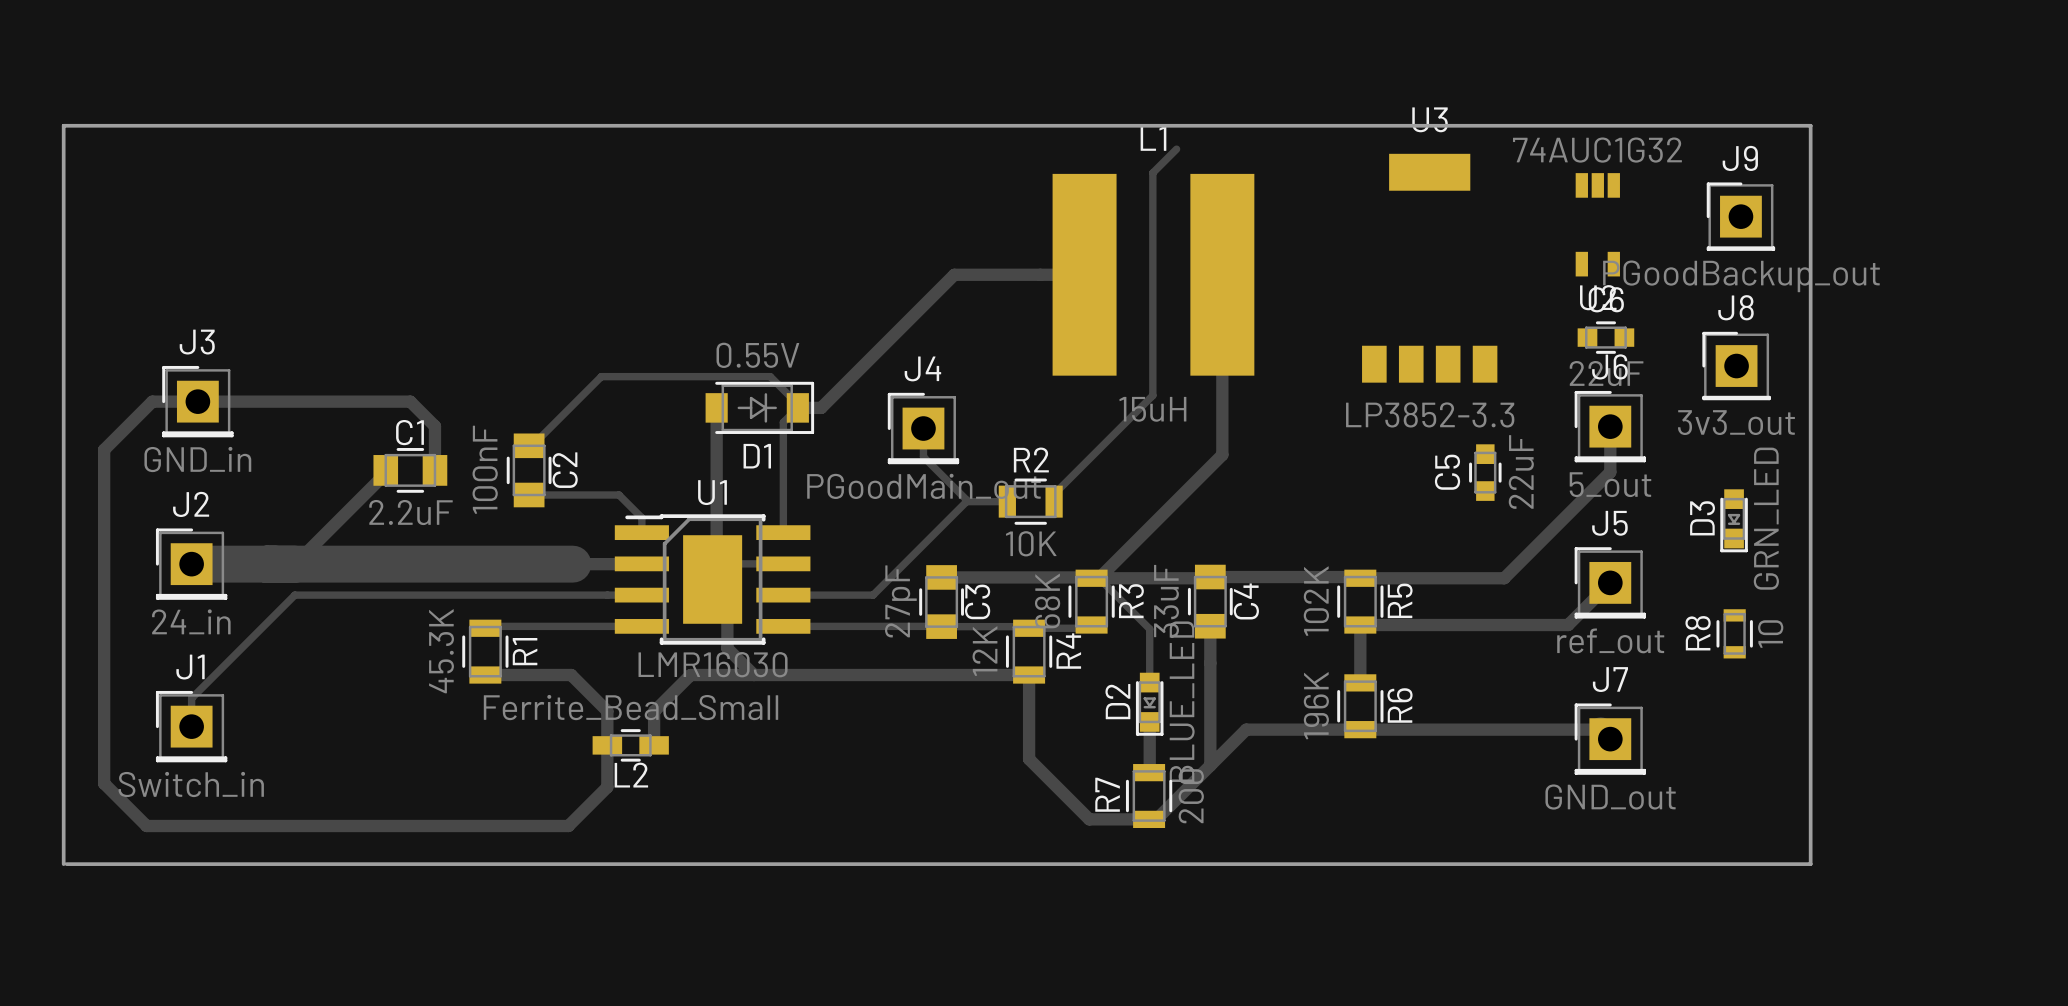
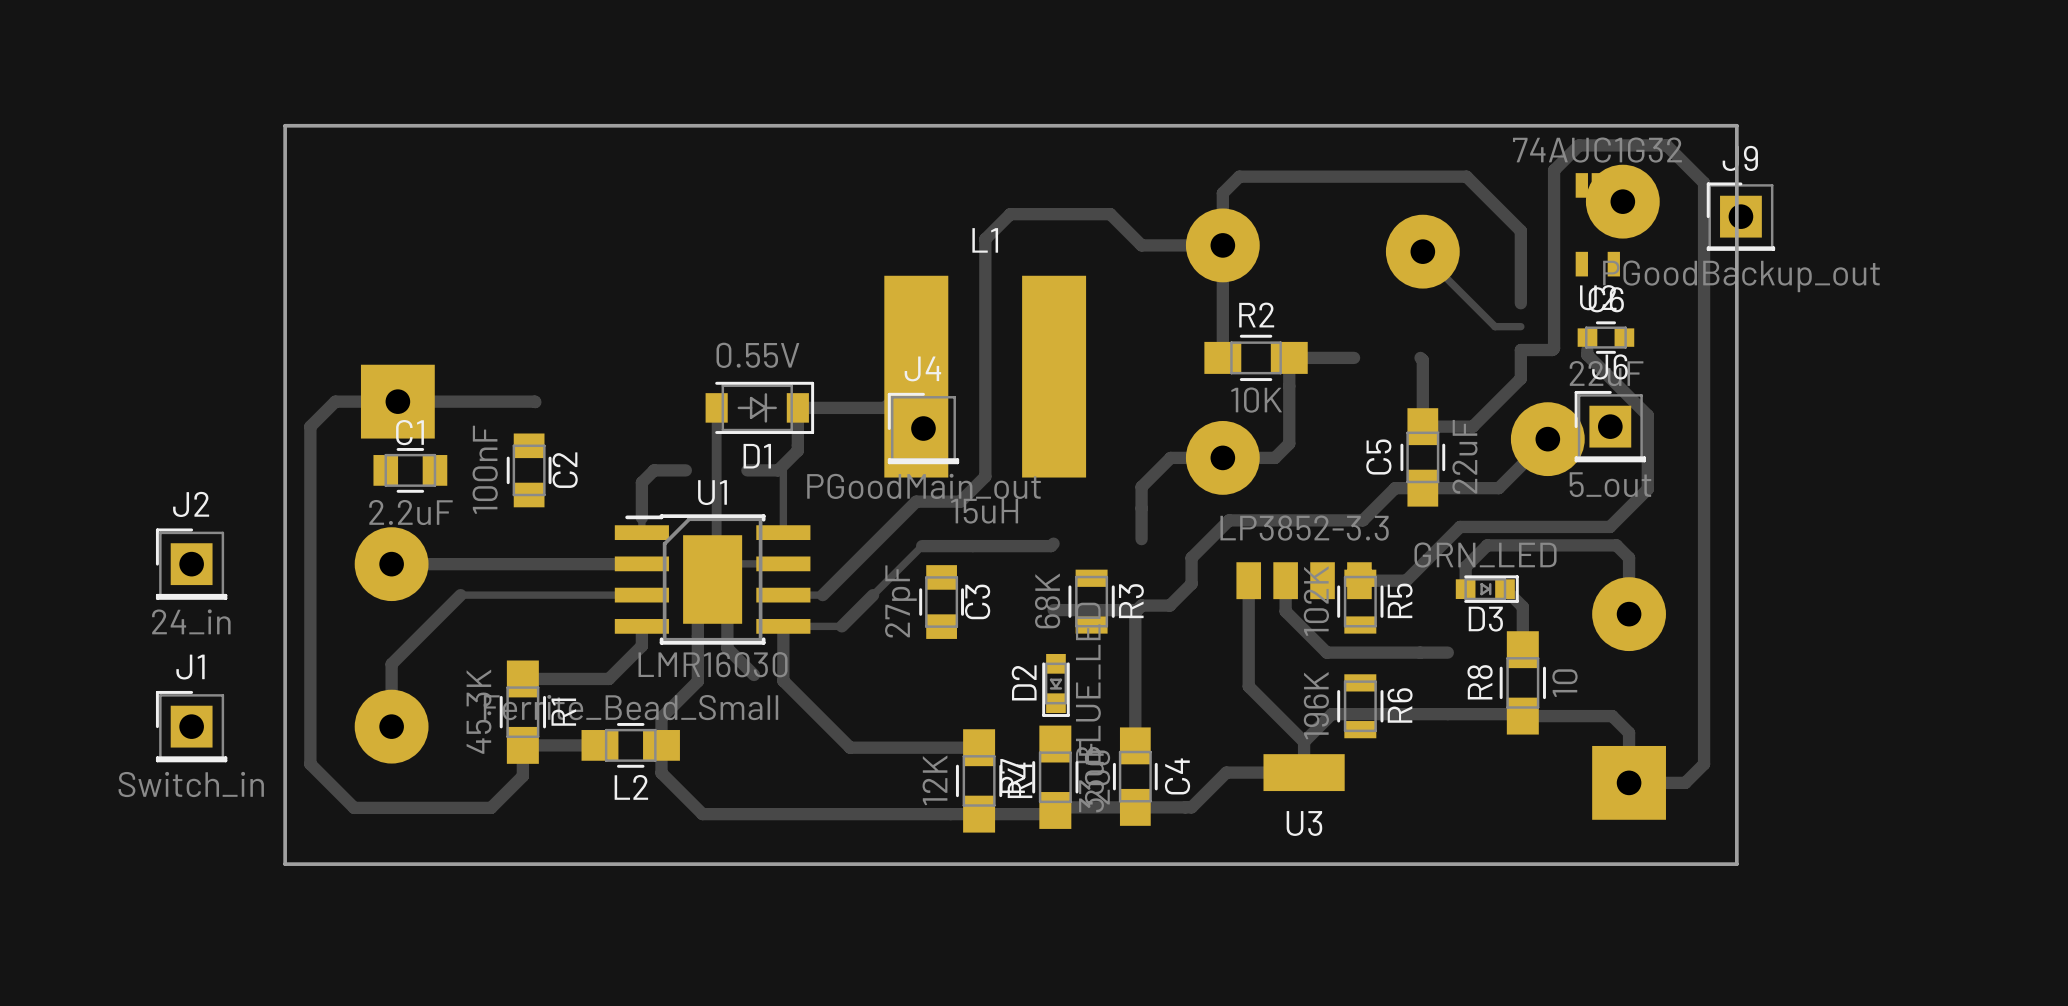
board edge: (285, 125) (63, 125) (63, 864) -> (285, 125) (285, 864)
board edge: (1736, 125) (1810, 125) (1810, 864) (1736, 864) -> (1736, 125) (1736, 864)
track: (1176, 149) (1152, 172) (1152, 395) (1054, 494) (1054, 501) -> none
part: none -> (1622, 201)
track: none -> (1222, 245) (1141, 245) (1110, 214) (1010, 214) (985, 239) (985, 476) (960, 501) (916, 501) (822, 595)
part: none -> (1222, 245)
track: none -> (1422, 251) (1422, 254) (1495, 326) (1520, 326)
part: none -> (1422, 251)
U3 rotation: 0° (1429, 268) -> 180° (1304, 676)
U3 position: (1429, 268) -> (1304, 676)
track: (1084, 274) (954, 274) (821, 407) -> (916, 376) (885, 407) (821, 407)
L1 position: (1153, 274) -> (985, 376)
track: (1222, 274) (1222, 454) (1098, 578) (1149, 629) (1149, 682) -> none
track: none -> (1520, 303) (1520, 230) (1466, 176) (1239, 176) (1222, 193) (1222, 357)
track: none -> (1587, 350) (1587, 354) (1647, 415) (1647, 489) (1610, 526) (1460, 526) (1406, 580) (1359, 580)
track: none -> (1354, 357) (1289, 357) (1289, 443) (1275, 457) (1170, 457) (1141, 486) (1141, 539)
track: none -> (1420, 357) (1422, 360) (1422, 426) (1472, 426) (1520, 378) (1520, 350) (1552, 350) (1554, 348) (1554, 170) (1579, 145) (1666, 145) (1704, 182) (1704, 764) (1685, 782) (1629, 782) (1629, 732) (1612, 716) (1331, 714) (1304, 741)
J8: 3v3_out (1736, 366) -> none
J3: GND_in (197, 401) -> none
track: (335, 401) (152, 401) (104, 449) (104, 783) (146, 826) (568, 826) (607, 787) (607, 711) (571, 675) (485, 675) -> (335, 401) (310, 426) (310, 764) (354, 807) (491, 807) (522, 776) (522, 745) (599, 745)
part: none -> (397, 401)
track: (410, 401) (434, 426) (434, 470) -> (410, 401) (535, 402)
track: (797, 404) (770, 376) (601, 376) (532, 445) (529, 445) -> none
track width: thick (716, 407) (716, 546) (727, 557) -> thin (716, 407) (716, 546) (727, 557)
track: (797, 407) (783, 422) (783, 465) -> (797, 407) (797, 450) (778, 470) (747, 470)
track: (1610, 426) (1610, 472) (1504, 578) (941, 577) -> none
track: (923, 428) (923, 456) (966, 501) -> none
track: none -> (1547, 439) (1498, 488) (1395, 488) (1362, 520) (1229, 520) (1191, 557) (1191, 583) (1169, 605) (1141, 605) (1135, 611) (1135, 745)
part: none -> (1547, 439)
C5 footprint: [1469, 444, 1502, 501] -> [1400, 408, 1446, 507]
part: none -> (1222, 457)
track: (385, 473) (295, 564) -> none
R2 footprint: [998, 478, 1063, 525] -> [1204, 334, 1308, 382]
track: (529, 495) (619, 495) (641, 517) -> (685, 470) (654, 470) (641, 482) (641, 517)
track: (966, 501) (922, 546) -> (1053, 543) (1051, 546) (922, 546)
track: (966, 501) (1007, 501) -> none
D3 rotation: 0° (1734, 520) -> 90° counterclockwise (1487, 589)
D3 position: (1734, 520) -> (1487, 589)
track: (191, 564) (391, 564) -> none
track width: thick (391, 564) (572, 564) -> thin (391, 564) (572, 564)
part: none -> (391, 564)
C4 footprint: [1187, 564, 1233, 639] -> [1112, 727, 1158, 826]
track: none -> (1248, 580) (1248, 686) (1304, 741)
track: none -> (1285, 580) (1285, 611) (1326, 652) (1447, 652)
track: (1610, 582) (1568, 625) (1360, 625) (1360, 682) -> none
J5: ref_out (1610, 582) -> none
track: none -> (1465, 589) (1465, 566) (1487, 545) (1616, 545) (1629, 557) (1629, 614)
track: none -> (1505, 589) (1522, 606) (1522, 649)
track: (460, 595) (294, 595) (191, 698) (191, 726) -> (460, 595) (391, 664) (391, 726)
track: (822, 595) (873, 595) -> (841, 626) (873, 595)
track: none -> (697, 601) (697, 681) (661, 717) (661, 773) (702, 814) (1051, 814) (1058, 807) (1191, 807) (1226, 772) (1304, 772) (1304, 741)
R8 footprint: [1716, 609, 1753, 659] -> [1499, 631, 1546, 735]
track: none -> (1053, 610) (1137, 610)
part: none -> (1629, 614)
R1 footprint: [462, 619, 509, 684] -> [499, 660, 546, 764]
R4 footprint: [1005, 619, 1053, 684] -> [955, 729, 1003, 833]
track: (1091, 625) (1088, 628) (941, 626) -> none
track: (641, 626) (487, 626) (485, 628) -> (641, 626) (641, 646) (608, 678) (522, 678)
track: none -> (783, 626) (783, 680) (850, 747) (979, 747)
track: (841, 626) (941, 626) -> none
track: (1210, 626) (1210, 765) -> none
D2 position: (1149, 704) -> (1055, 685)
track: (1149, 721) (1149, 772) -> none
part: none -> (391, 726)
L2 footprint: [592, 729, 669, 762] -> [581, 722, 680, 768]
track: (1610, 739) (1600, 729) (1246, 729) (1156, 819) -> none
J7: GND_out (1610, 739) -> none
track: (654, 745) (654, 711) (690, 675) (1029, 675) (1029, 759) (1089, 819) (1149, 819) -> none
R7 footprint: [1125, 764, 1173, 828] -> [1032, 725, 1079, 829]
L2 name position: L2 (631, 775) -> L2 (631, 787)
part: none -> (1629, 782)
board edge: (66, 864) (285, 864) -> none

